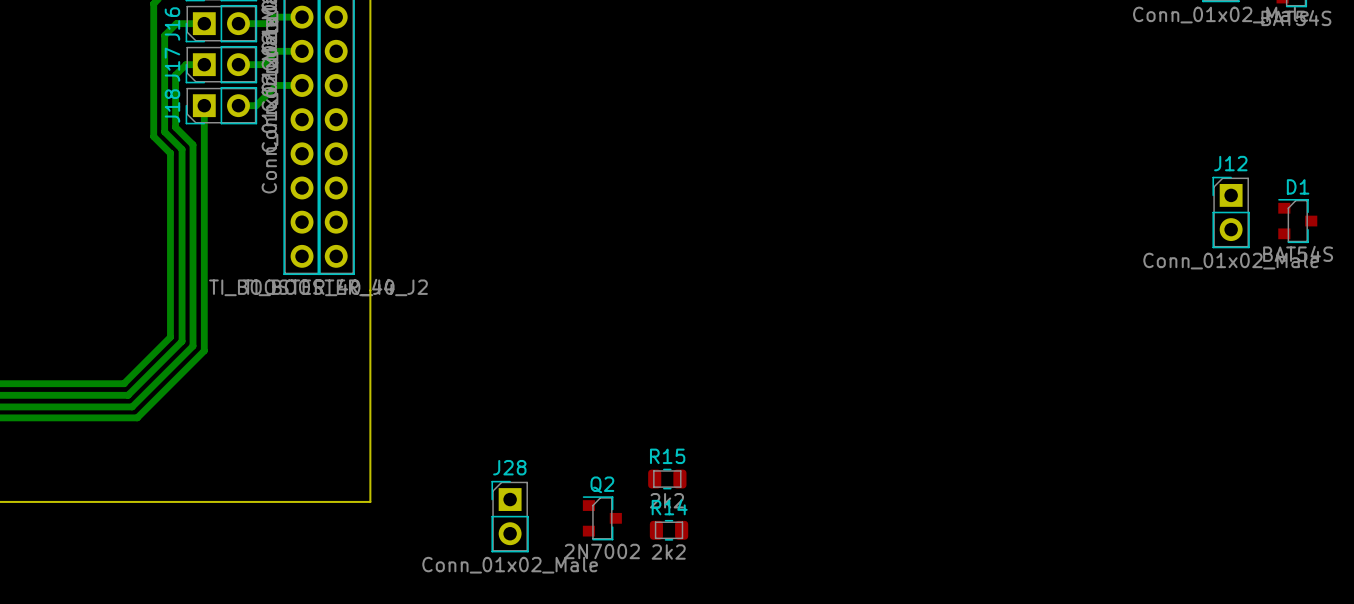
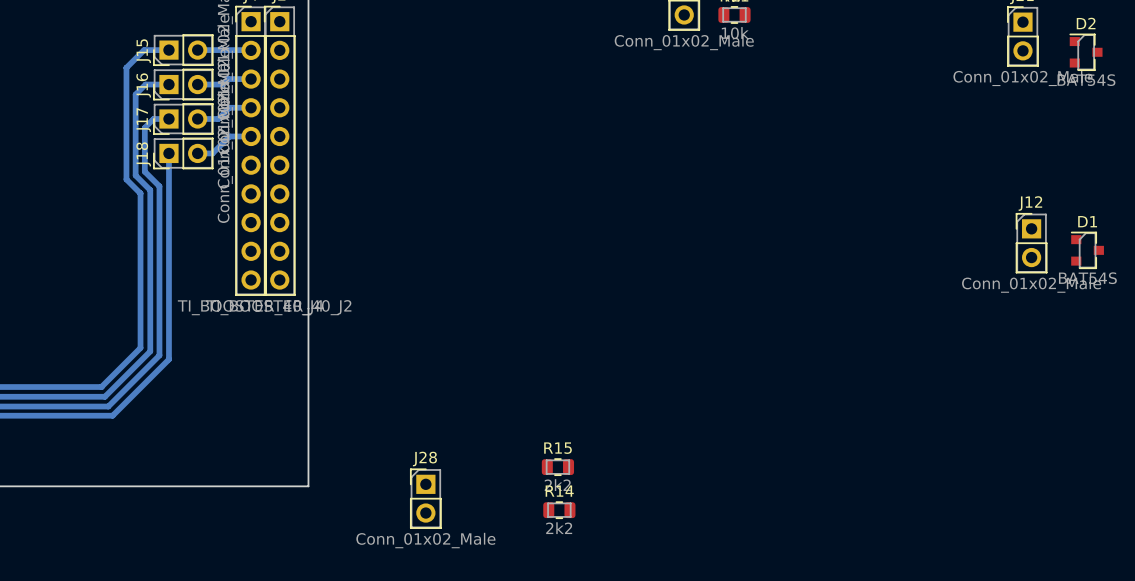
Q2: 2N7002 (602, 518) -> none

